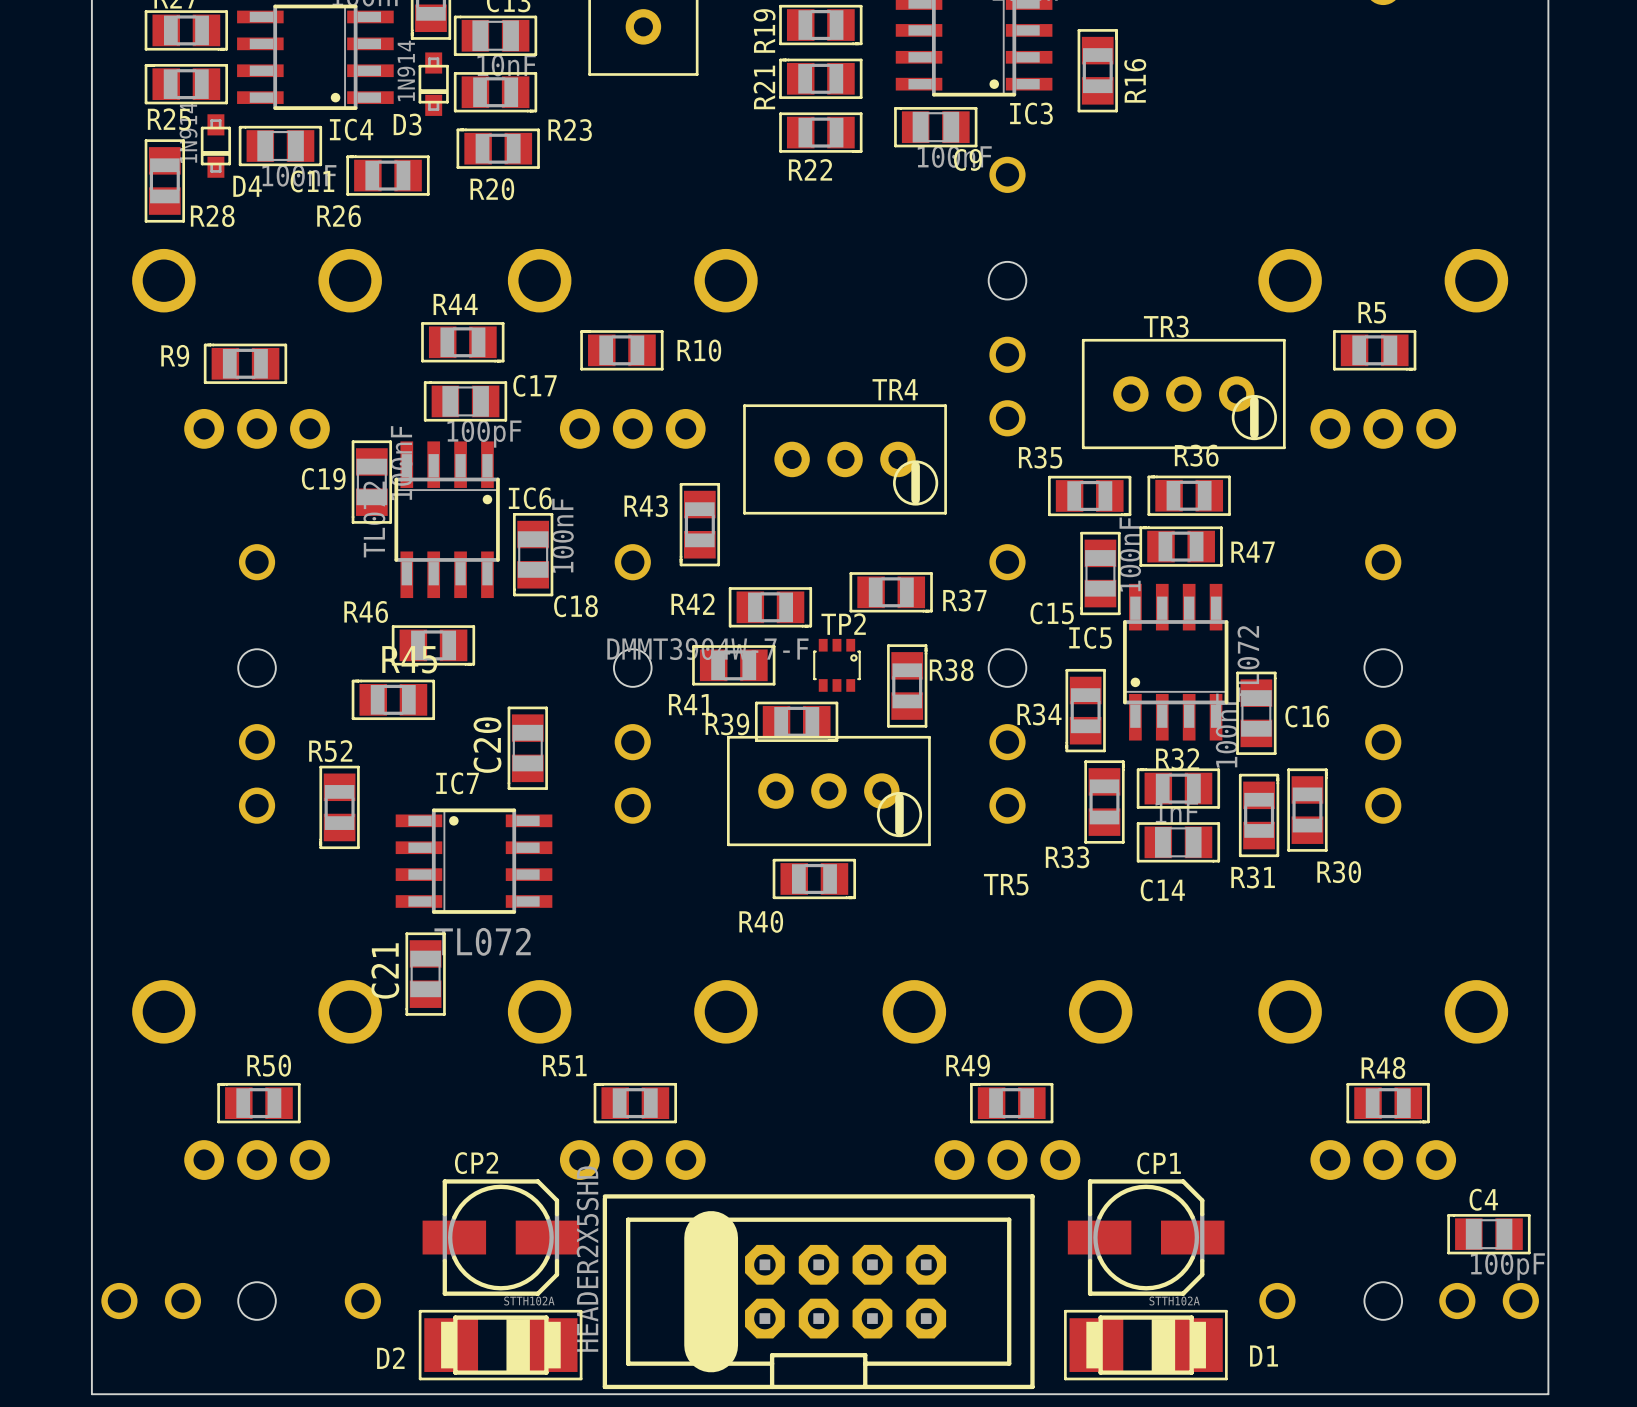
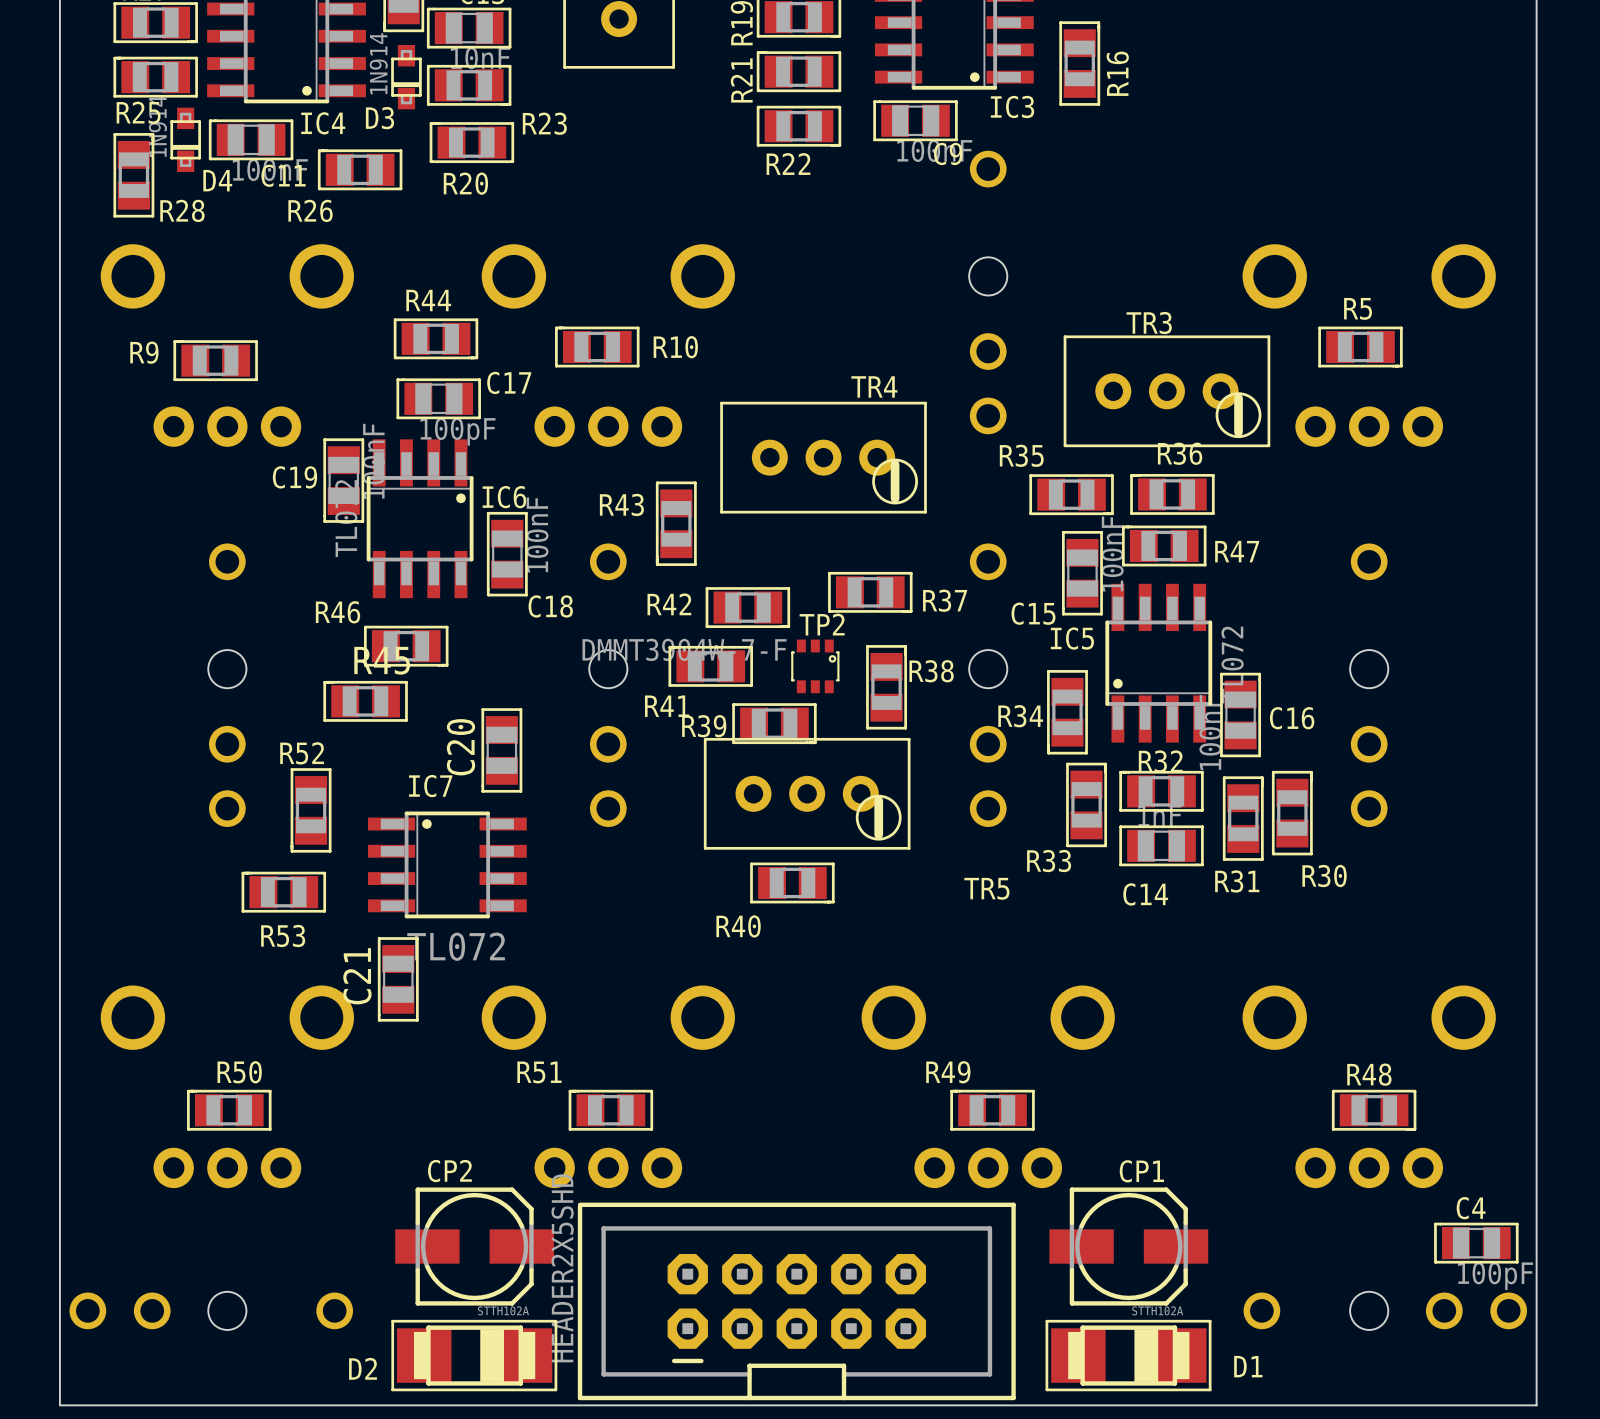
R53: none -> (283, 892)
part footprint: [602, 1194, 1035, 1390] -> [577, 1202, 1016, 1401]

